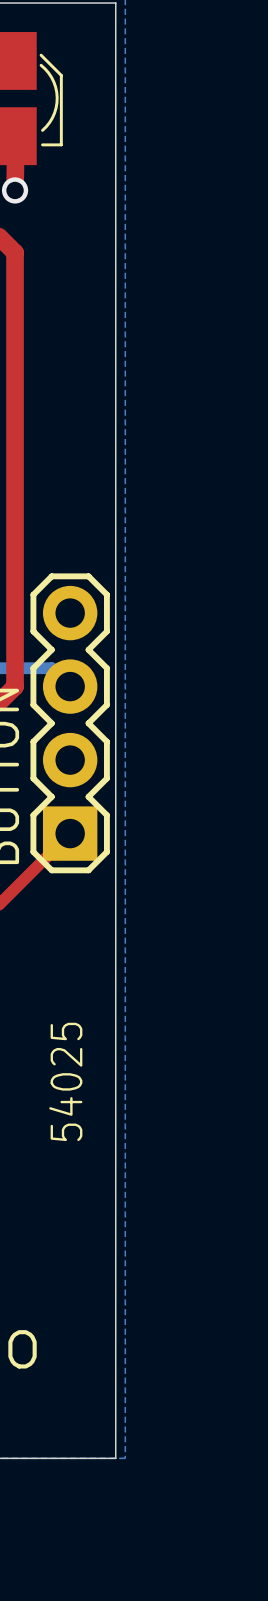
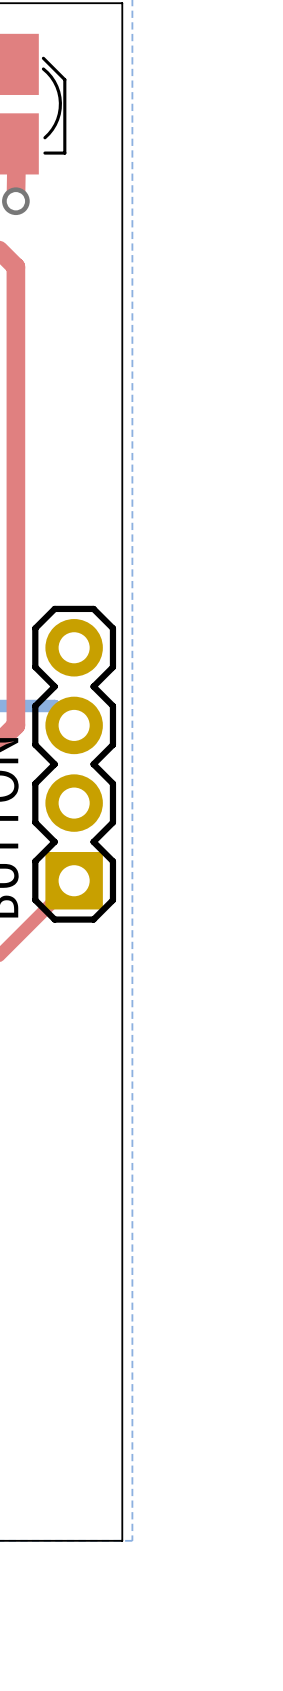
text: 54025 (65, 1081) -> none

